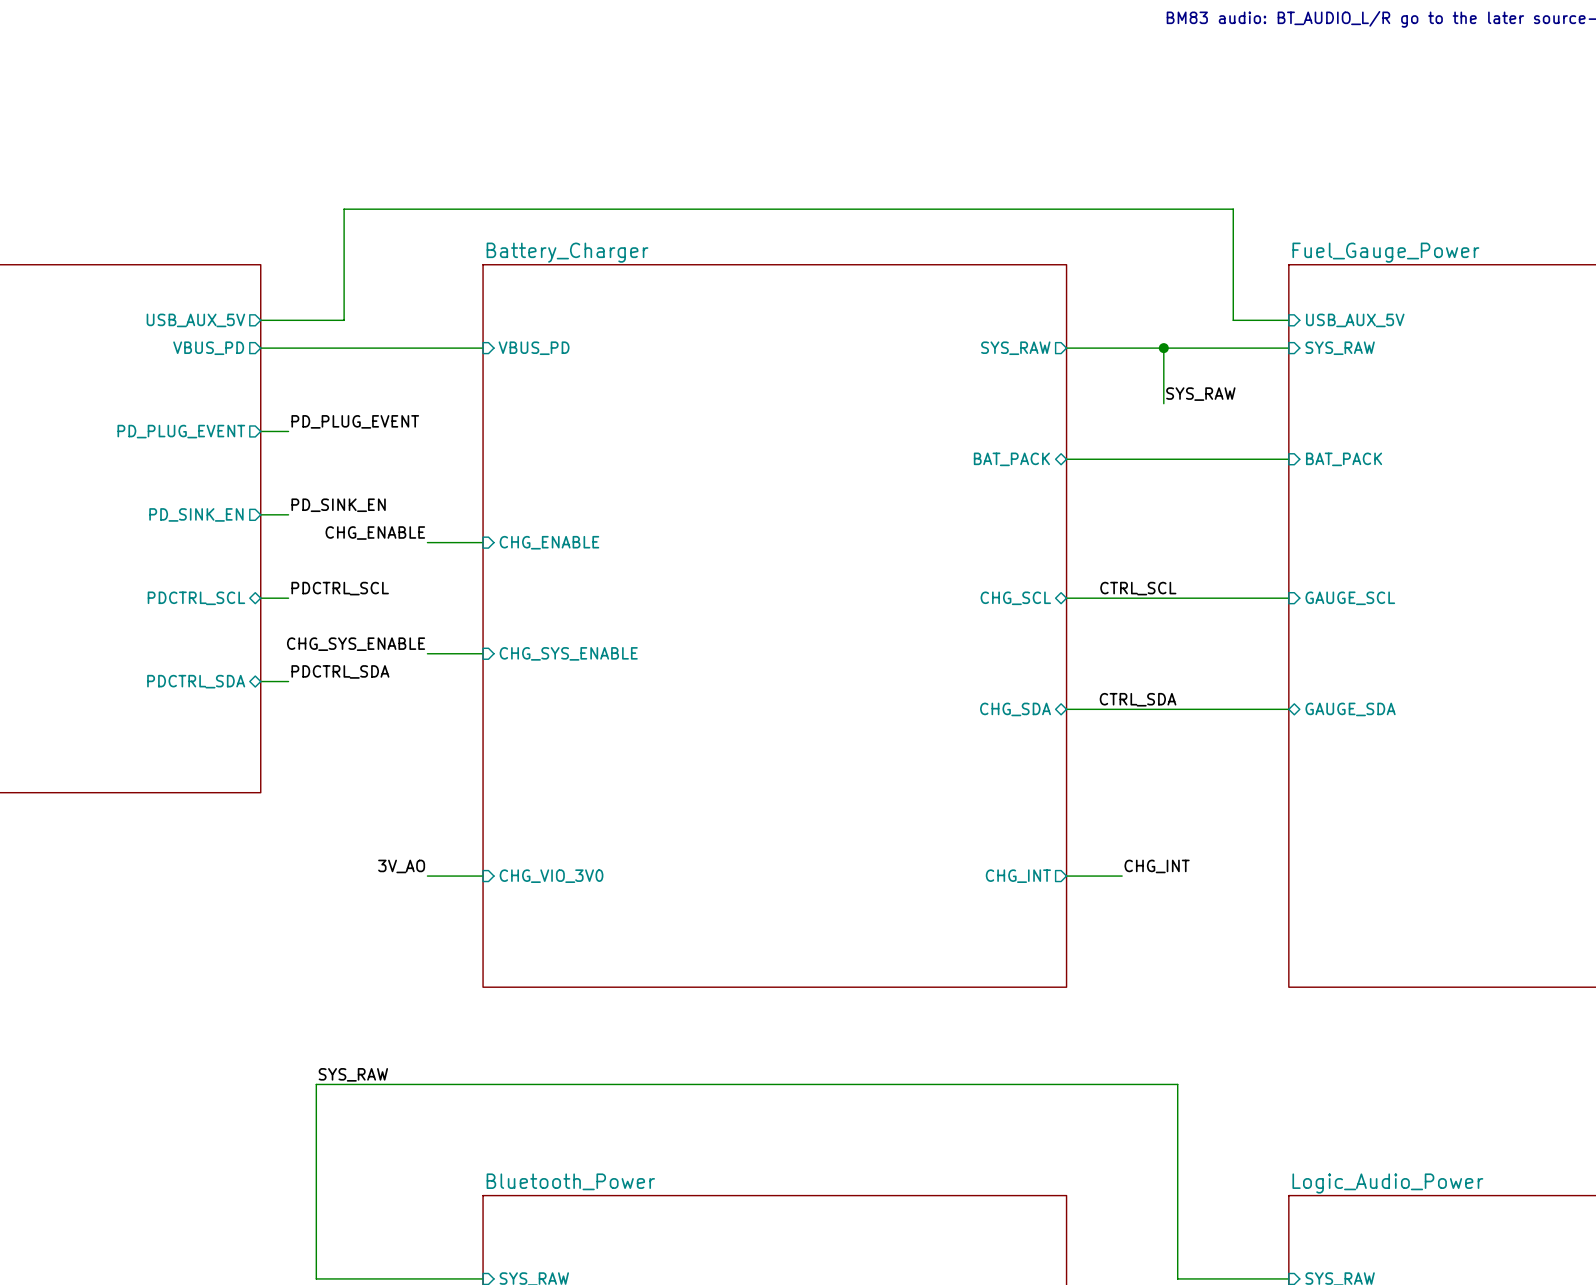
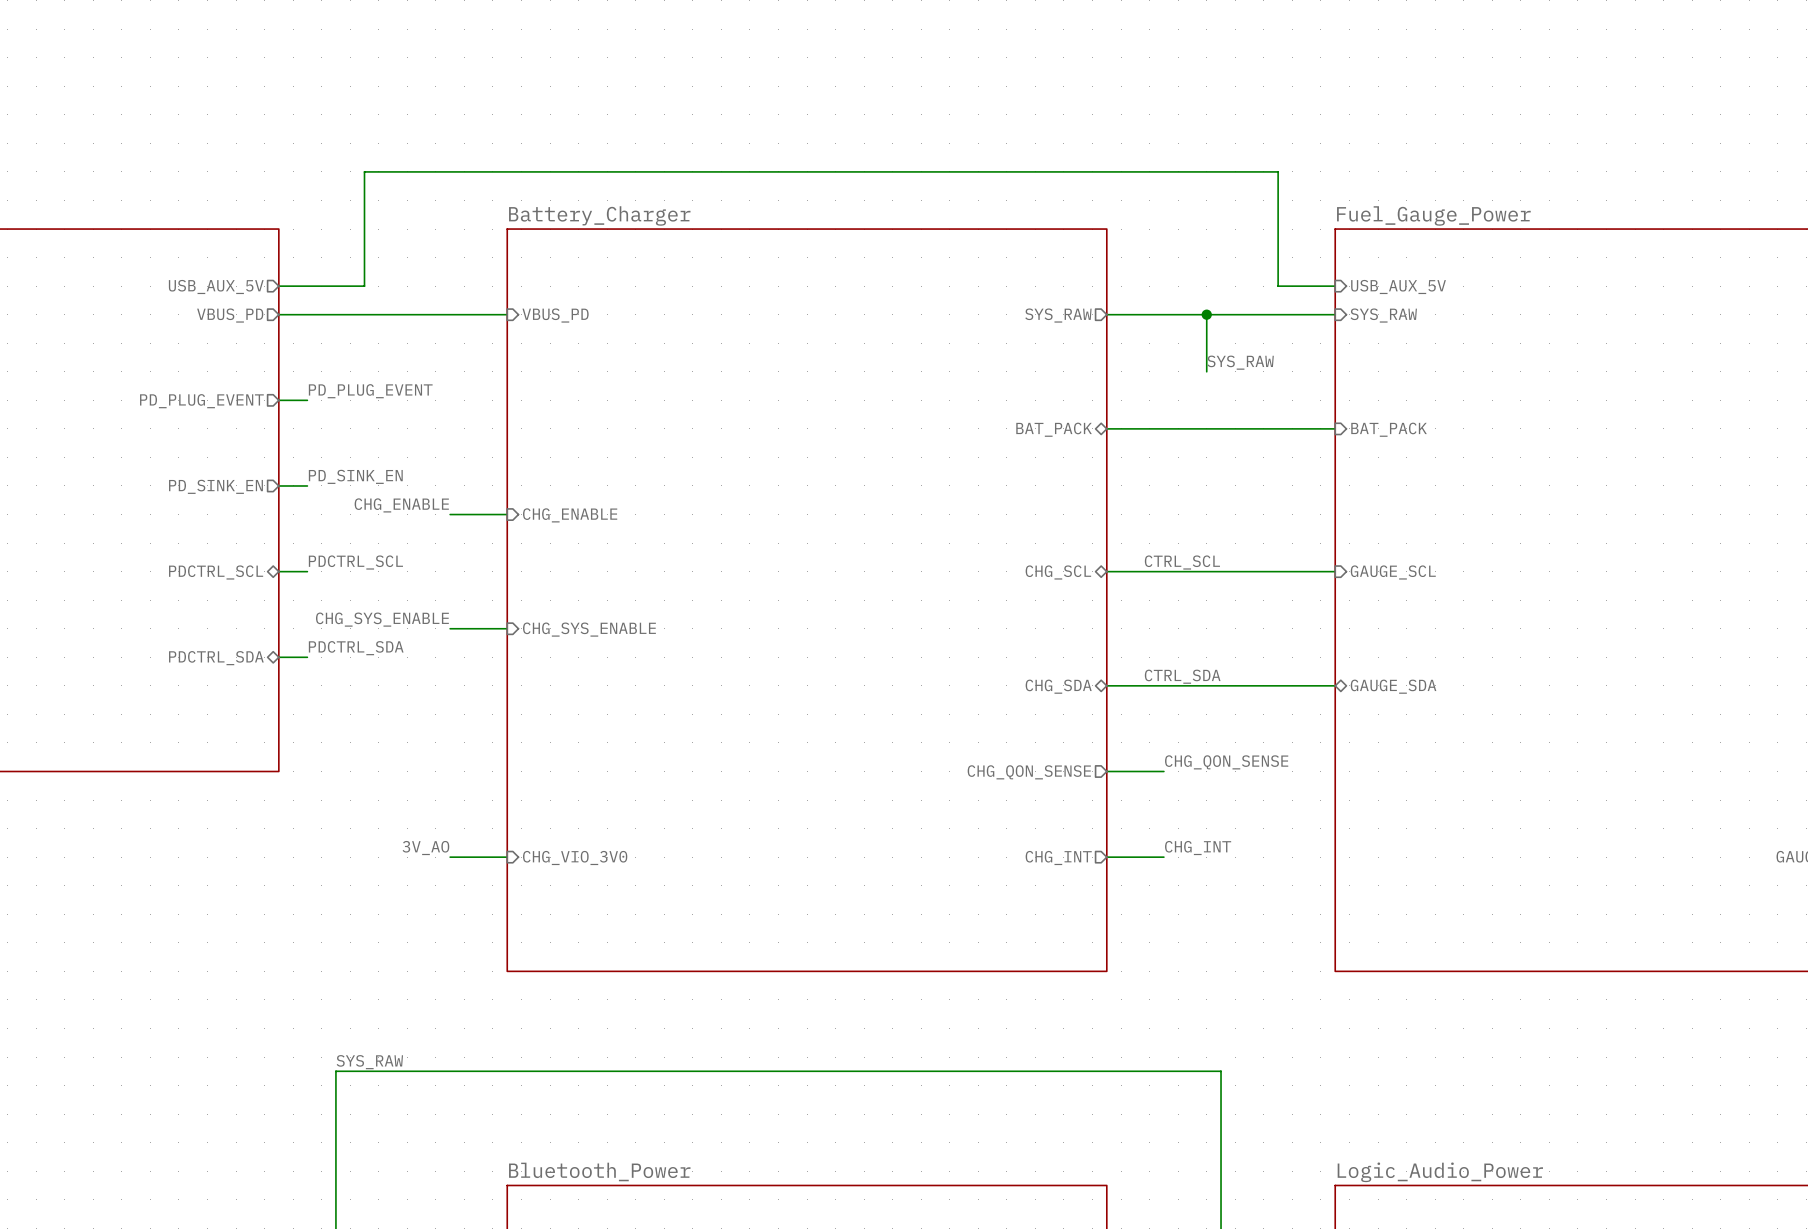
label: none -> CHG_QON_SENSE (1226, 762)
sheet pin: none -> CHG_QON_SENSE (1029, 772)
wire: none -> (1106, 771) (1163, 771)

